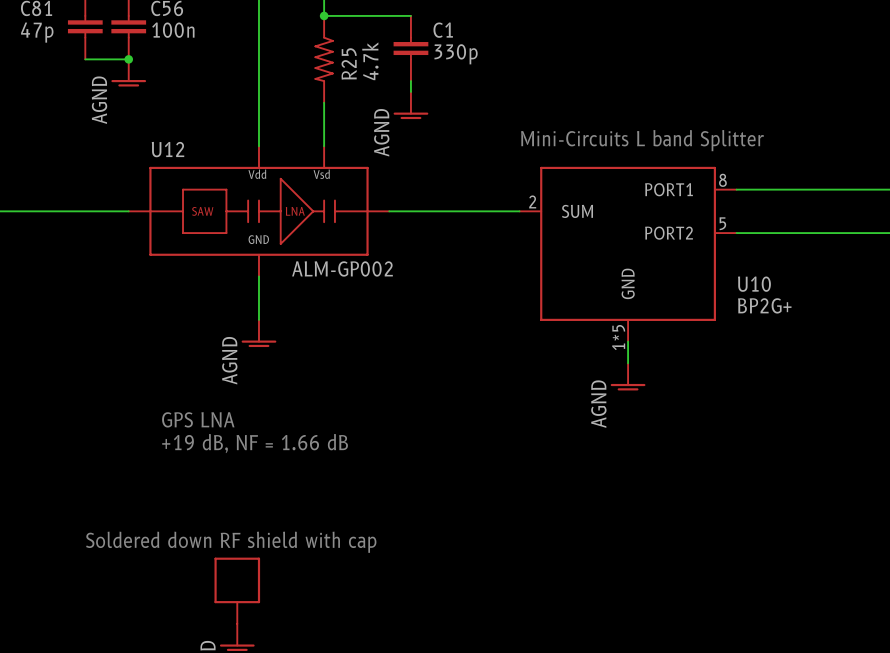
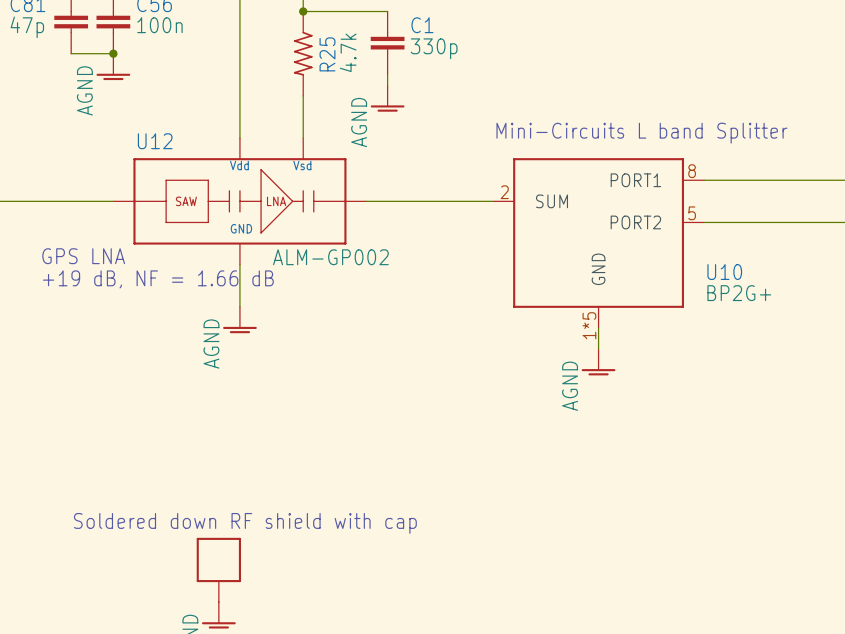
text position: GPS LNA (198, 419) -> GPS LNA (83, 256)
text position: +19 dB, NF = 1.66 dB (255, 443) -> +19 dB, NF = 1.66 dB (158, 279)

